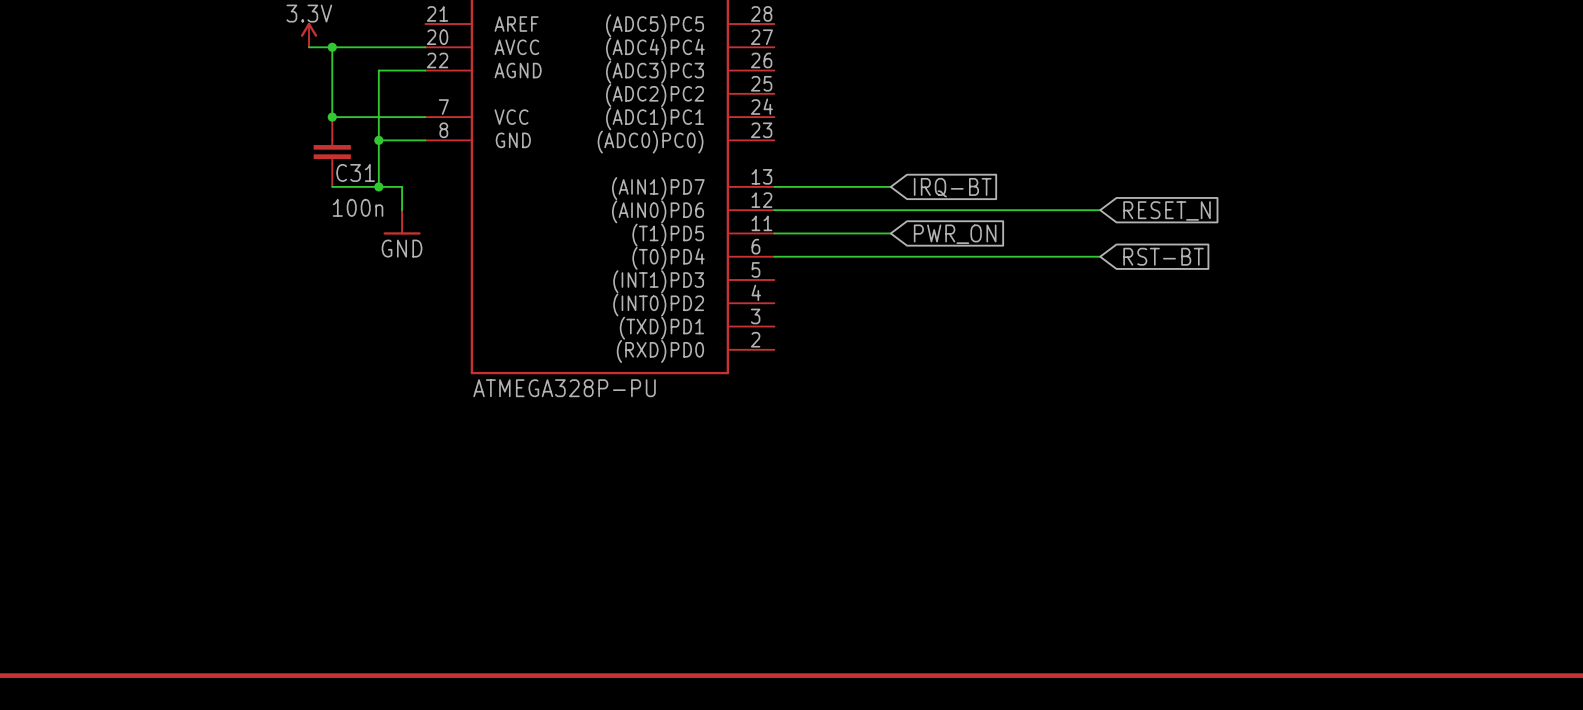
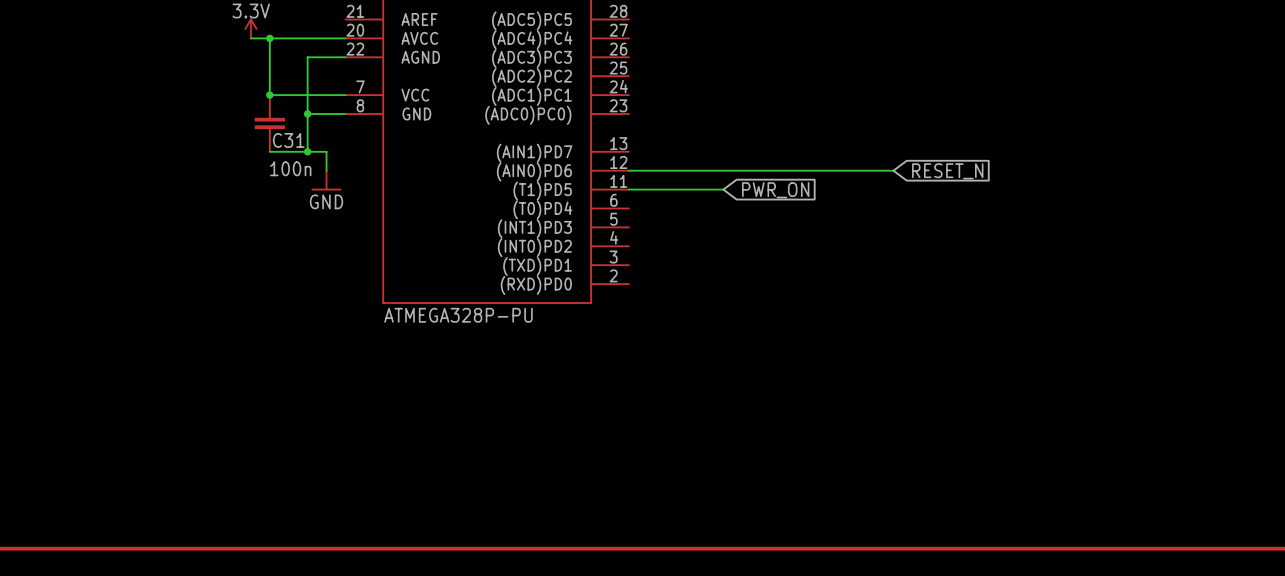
wire: (774, 186) (890, 186) -> none
global label: IRQ-BT (952, 187) -> none
wire: (774, 256) (1100, 256) -> none
global label: RST-BT (1163, 256) -> none

